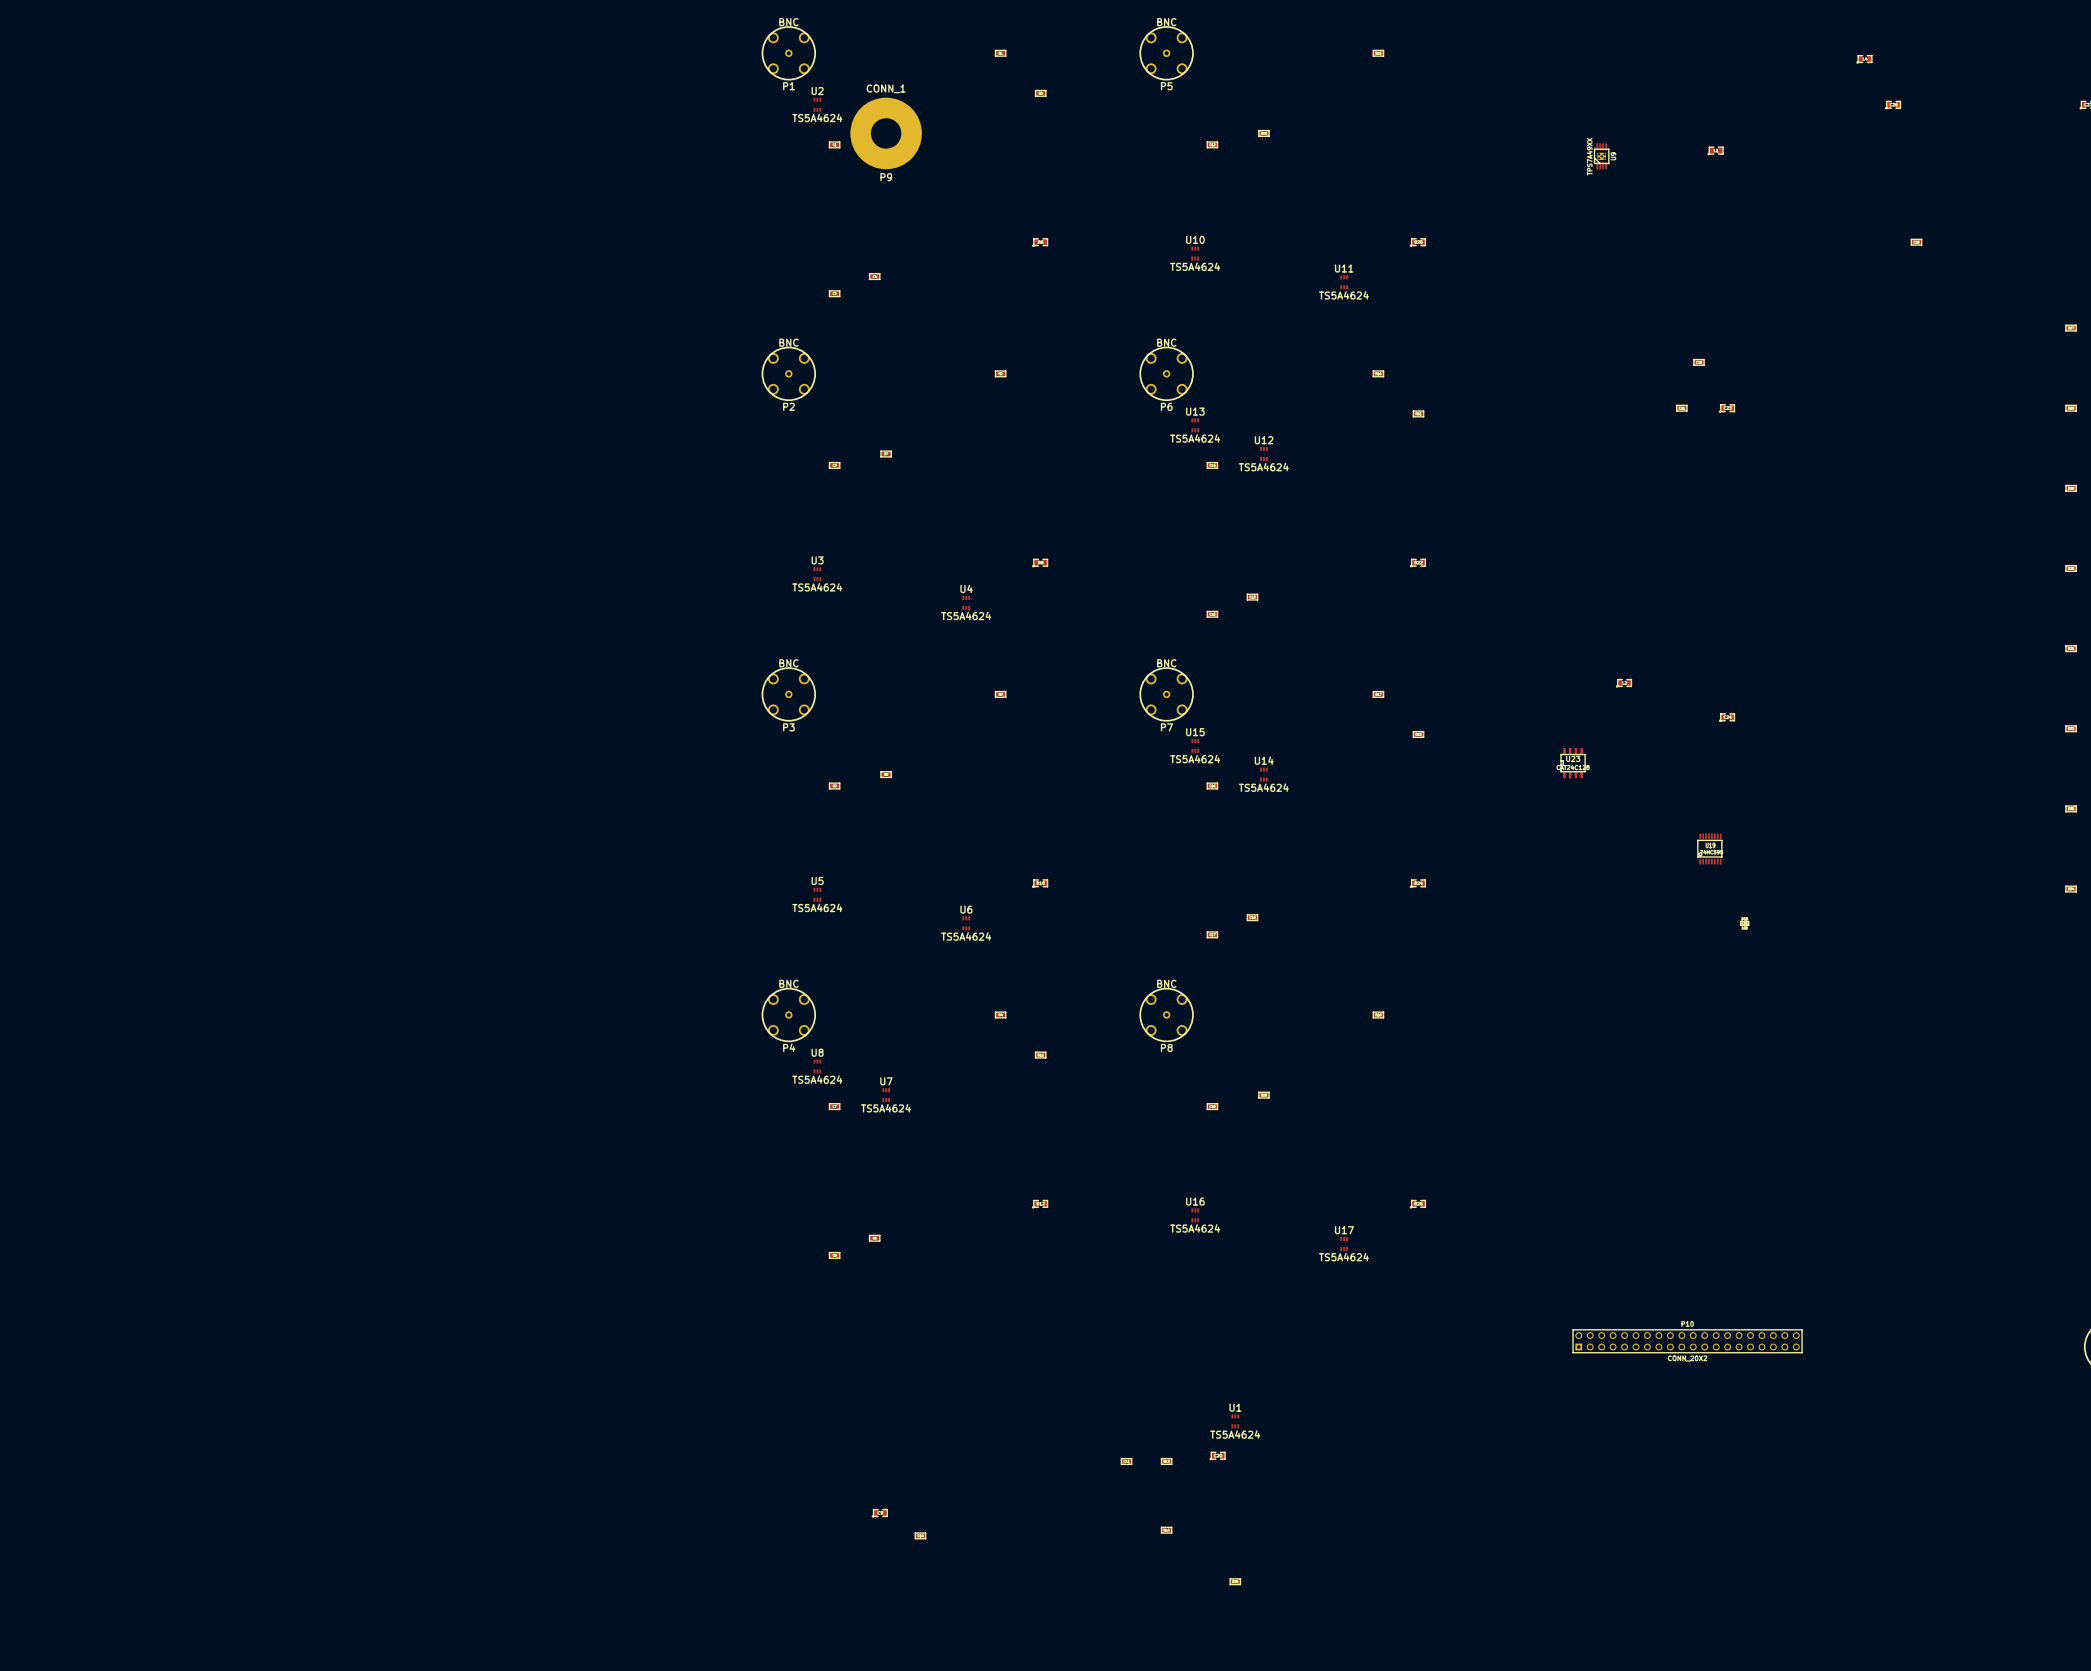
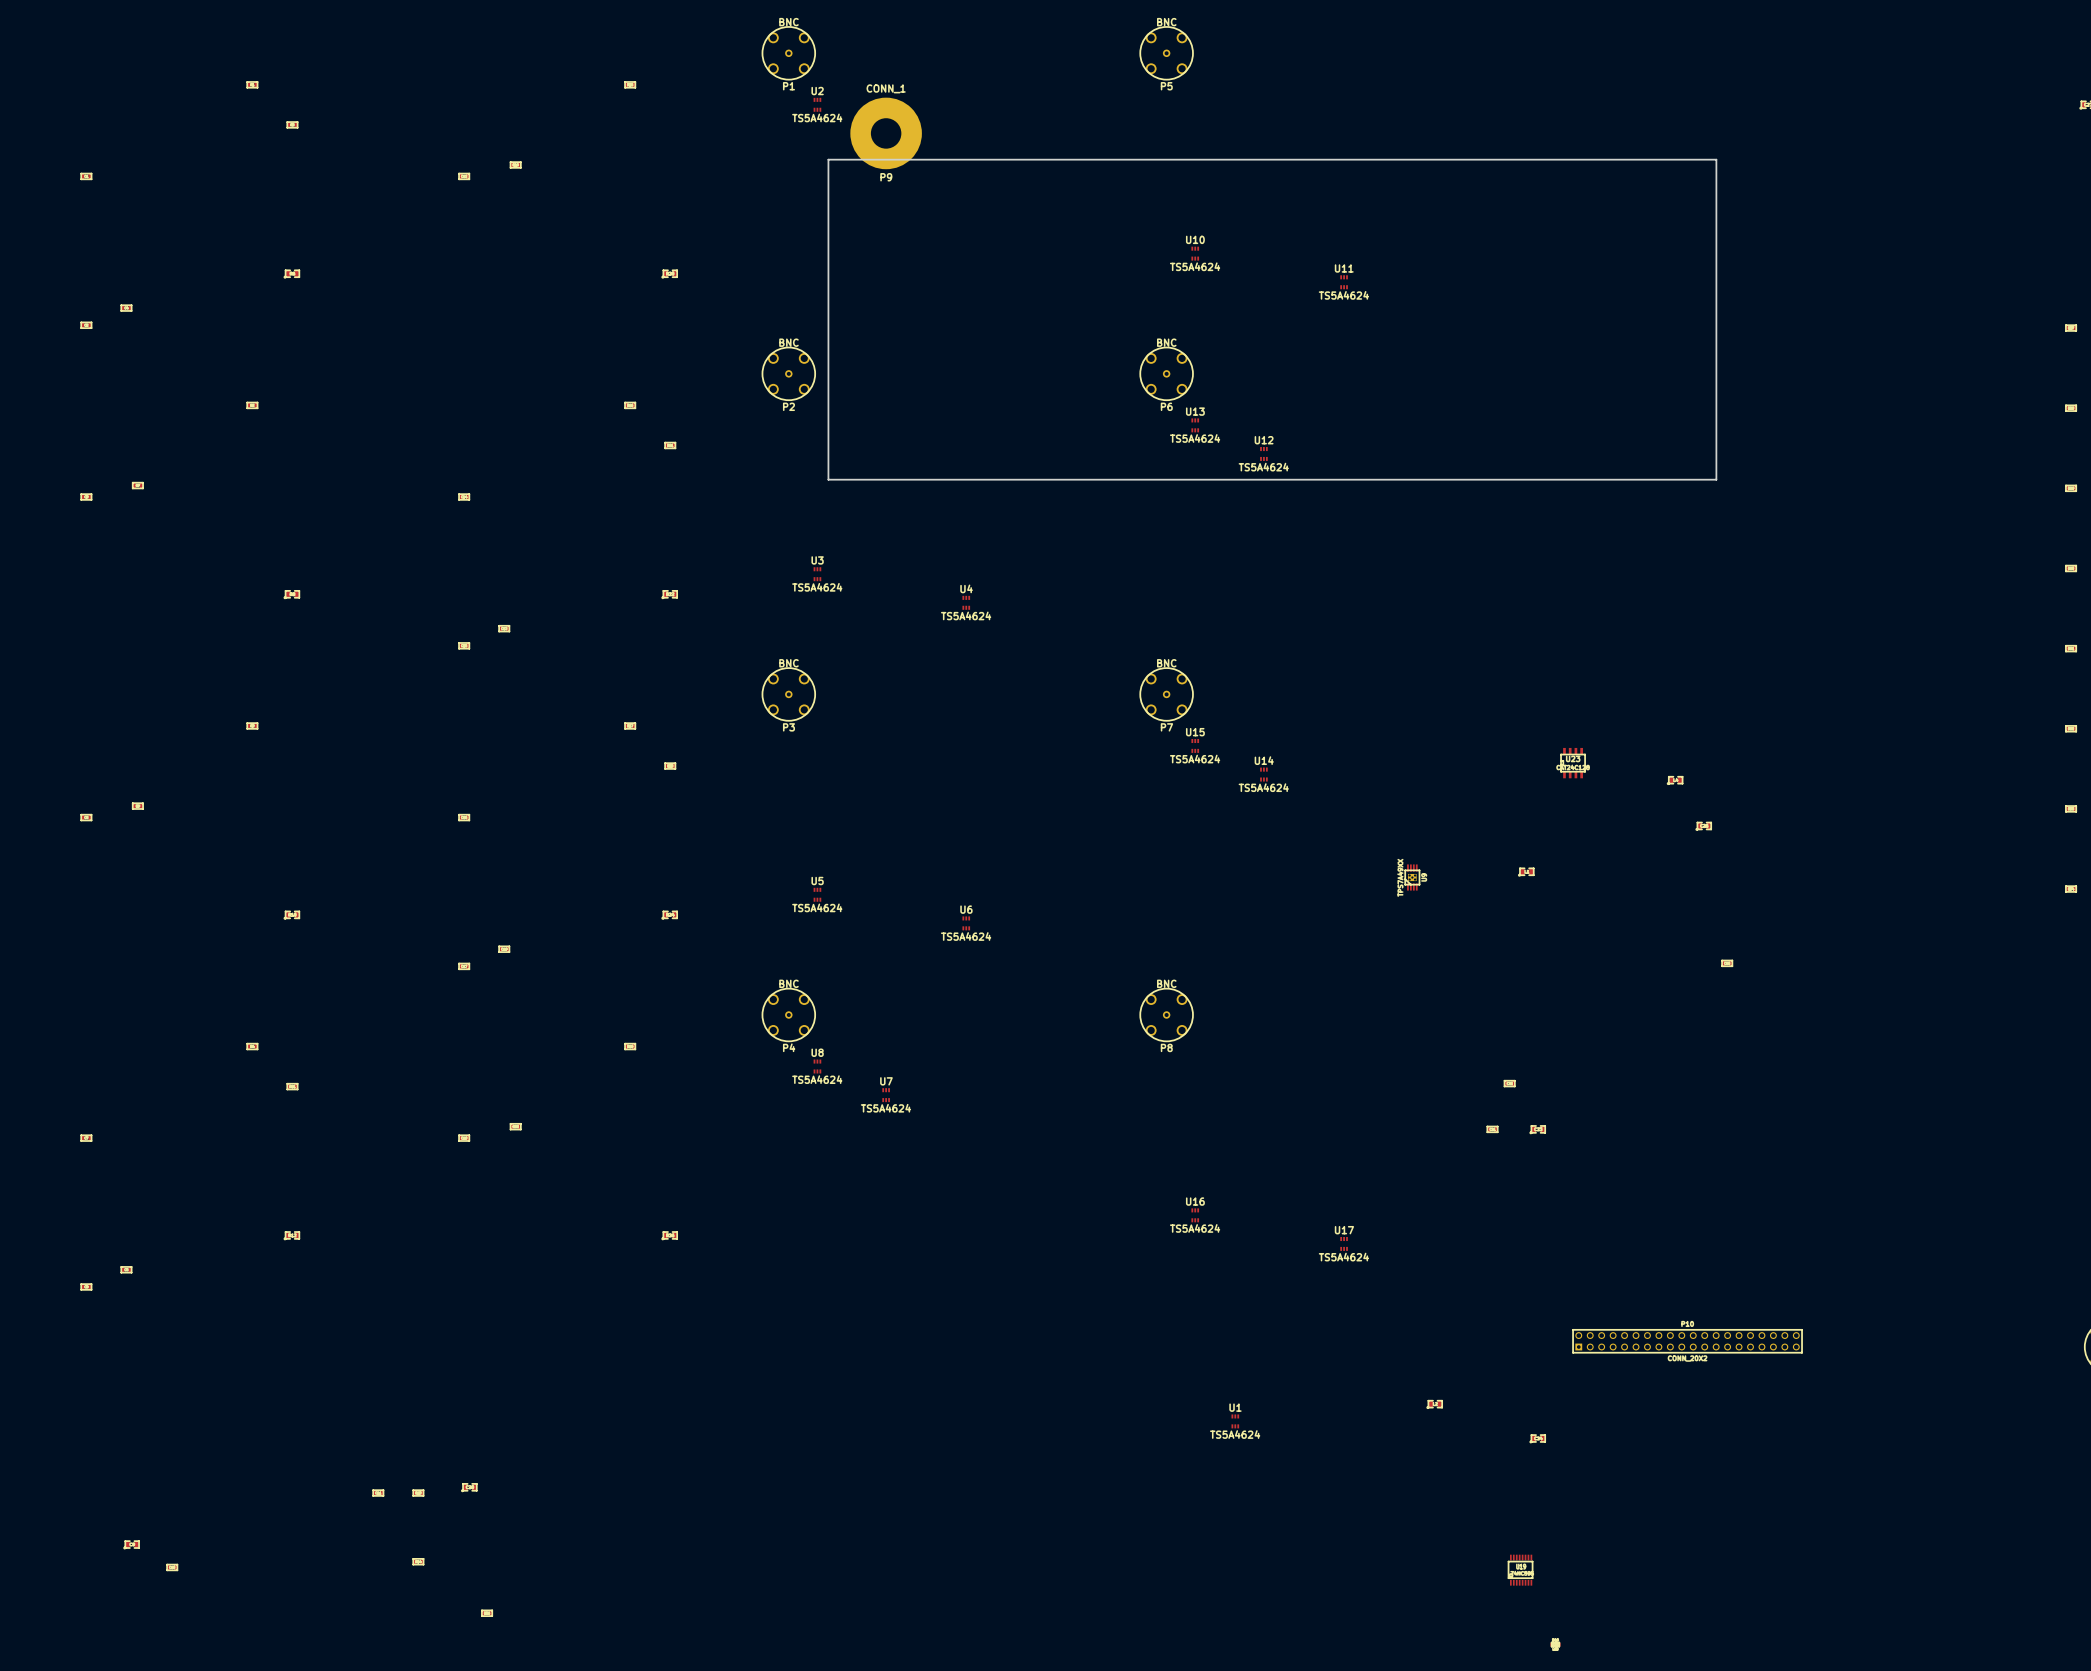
part position: (1000, 53) -> (252, 84)
part position: (1378, 53) -> (630, 84)
part position: (1864, 59) -> (1675, 780)
part position: (1040, 93) -> (292, 124)
part position: (1893, 105) -> (1703, 826)
part position: (1263, 133) -> (515, 164)
part position: (834, 144) -> (86, 176)
part position: (1212, 144) -> (464, 176)
part position: (1715, 150) -> (1526, 872)
part position: (1601, 156) -> (1412, 877)
board edge: none -> (828, 159) (828, 479) (1716, 479) (1716, 159) (828, 159)
part position: (1040, 242) -> (291, 274)
part position: (1417, 242) -> (669, 274)
part position: (1916, 242) -> (1727, 963)
part position: (874, 276) -> (126, 308)
part position: (834, 293) -> (86, 325)
part position: (1698, 362) -> (1509, 1083)
part position: (1000, 373) -> (252, 405)
part position: (1378, 373) -> (630, 405)
part position: (1681, 408) -> (1492, 1129)
part position: (1727, 408) -> (1537, 1129)
part position: (1418, 413) -> (670, 445)
part position: (886, 454) -> (137, 485)
part position: (834, 465) -> (86, 497)
part position: (1212, 465) -> (464, 497)
part position: (1040, 563) -> (291, 594)
part position: (1417, 563) -> (669, 594)
part position: (1252, 597) -> (504, 628)
part position: (1212, 614) -> (464, 645)
part position: (1624, 683) -> (1434, 1404)
part position: (1000, 694) -> (252, 725)
part position: (1378, 694) -> (630, 725)
part position: (1727, 717) -> (1537, 1438)
part position: (1418, 734) -> (670, 766)
part position: (886, 774) -> (137, 806)
part position: (834, 786) -> (86, 817)
part position: (1212, 786) -> (464, 817)
part position: (1709, 848) -> (1520, 1570)
part position: (1040, 883) -> (291, 915)
part position: (1417, 883) -> (669, 915)
part position: (1252, 917) -> (504, 949)
part position: (1744, 923) -> (1555, 1644)
part position: (1212, 934) -> (464, 966)
part position: (1000, 1014) -> (252, 1046)
part position: (1378, 1014) -> (630, 1046)
part position: (1040, 1055) -> (292, 1086)
part position: (1263, 1095) -> (515, 1126)
part position: (834, 1106) -> (86, 1138)
part position: (1212, 1106) -> (464, 1138)
part position: (1040, 1204) -> (291, 1235)
part position: (1417, 1204) -> (669, 1235)
part position: (874, 1238) -> (126, 1269)
part position: (834, 1255) -> (86, 1286)
part position: (1217, 1456) -> (469, 1487)
part position: (1126, 1461) -> (378, 1493)
part position: (1166, 1461) -> (418, 1493)
part position: (879, 1513) -> (131, 1544)
part position: (1166, 1530) -> (418, 1561)
part position: (920, 1535) -> (172, 1567)
part position: (1235, 1581) -> (487, 1613)

